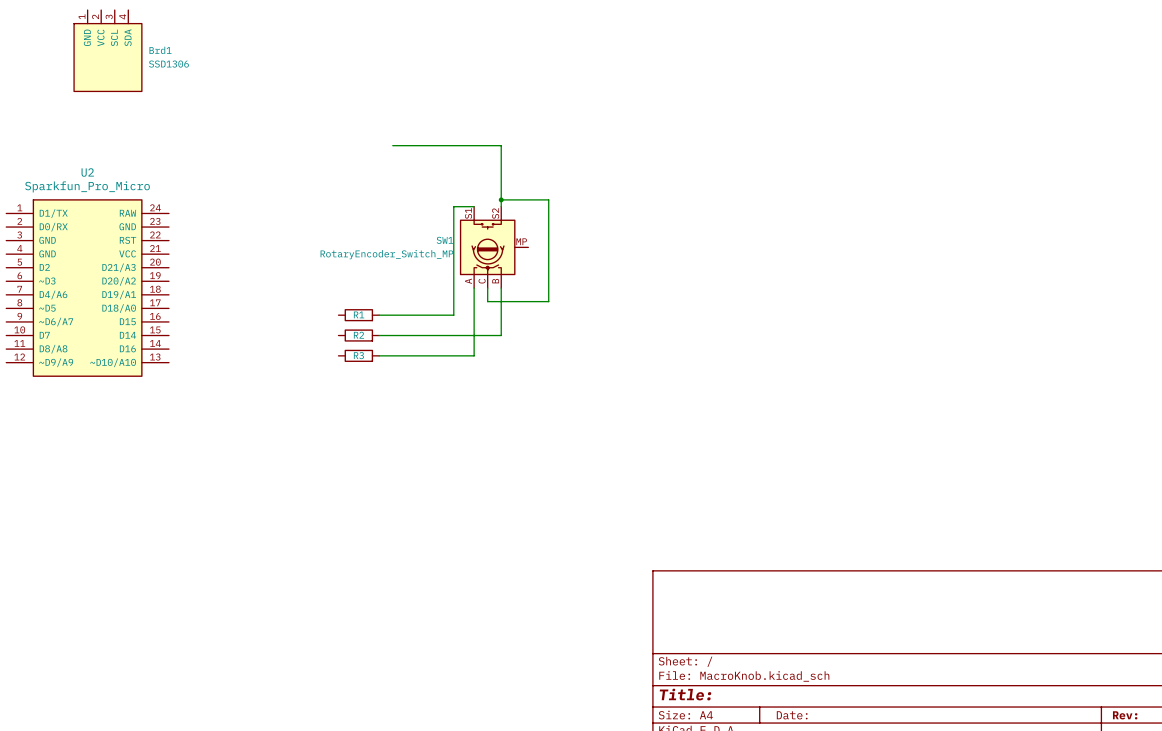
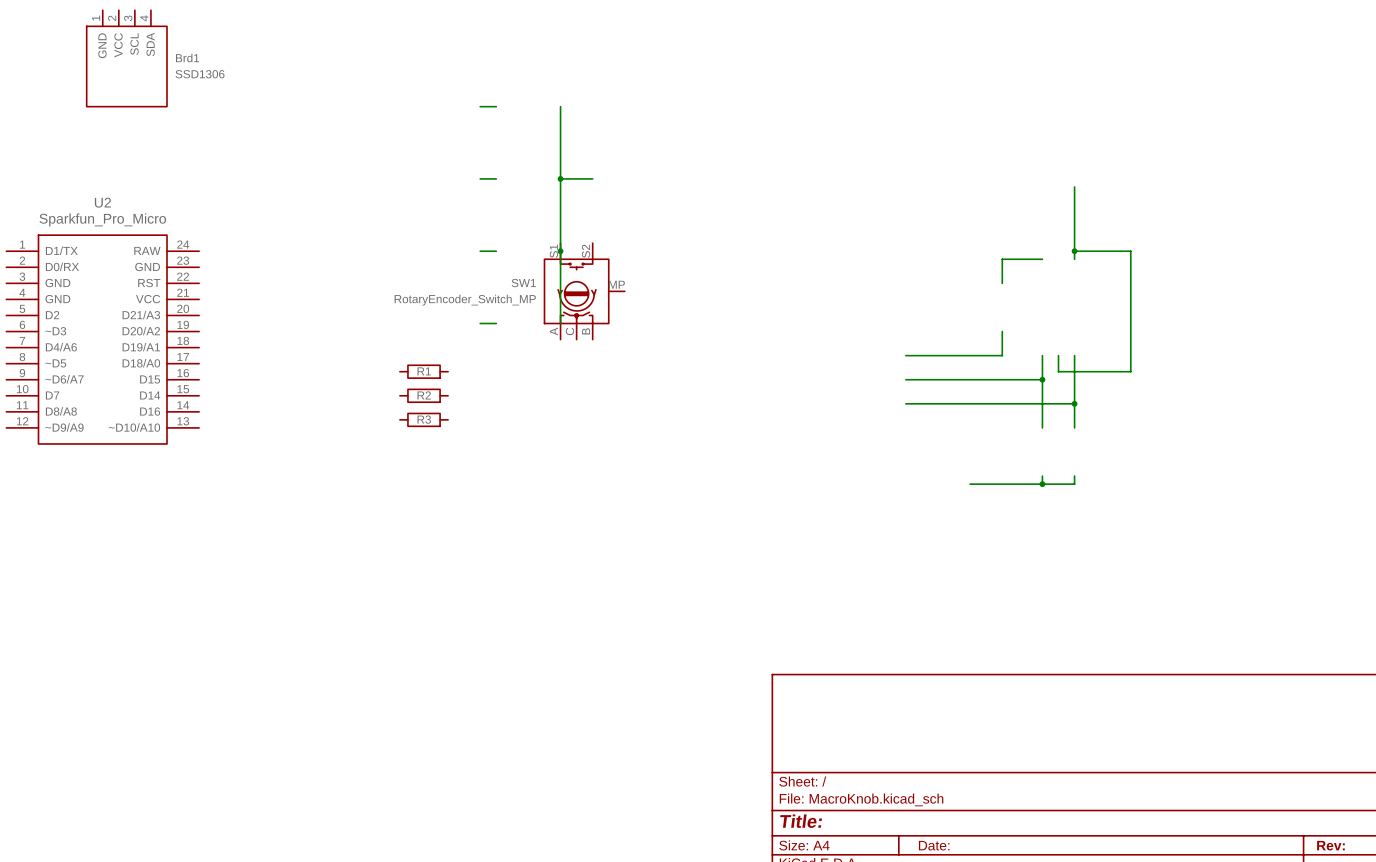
wire: none -> (480, 106) (496, 106)
wire: none -> (560, 106) (560, 323)
wire: (392, 145) (501, 145) (501, 206) -> none
wire: none -> (480, 178) (496, 178)
wire: none -> (560, 178) (592, 178)
junction: none -> (560, 178)
wire: none -> (1074, 186) (1074, 259)
wire: (501, 199) (548, 199) (548, 301) (487, 301) (487, 288) -> none
junction: (501, 199) -> none
wire: (474, 206) (453, 206) (453, 315) (379, 315) -> none
wire: none -> (480, 251) (496, 251)
junction: none -> (560, 251)
wire: none -> (1074, 251) (1130, 251) (1130, 371) (1058, 371) (1058, 355)
junction: none -> (1074, 251)
wire: none -> (1042, 259) (1002, 259) (1002, 283)
wire: none -> (480, 323) (496, 323)
wire: none -> (1002, 331) (1002, 355) (905, 355)
wire: (474, 288) (474, 355) (379, 355) -> none
wire: (501, 288) (501, 335) (379, 335) -> none
wire: none -> (1042, 355) (1042, 427)
wire: none -> (1074, 355) (1074, 427)
wire: none -> (905, 379) (1042, 379)
junction: none -> (1042, 379)
wire: none -> (905, 403) (1074, 403)
junction: none -> (1074, 403)
wire: none -> (1042, 476) (1042, 484)
wire: none -> (1074, 476) (1074, 484) (970, 484)
junction: none -> (1042, 484)

